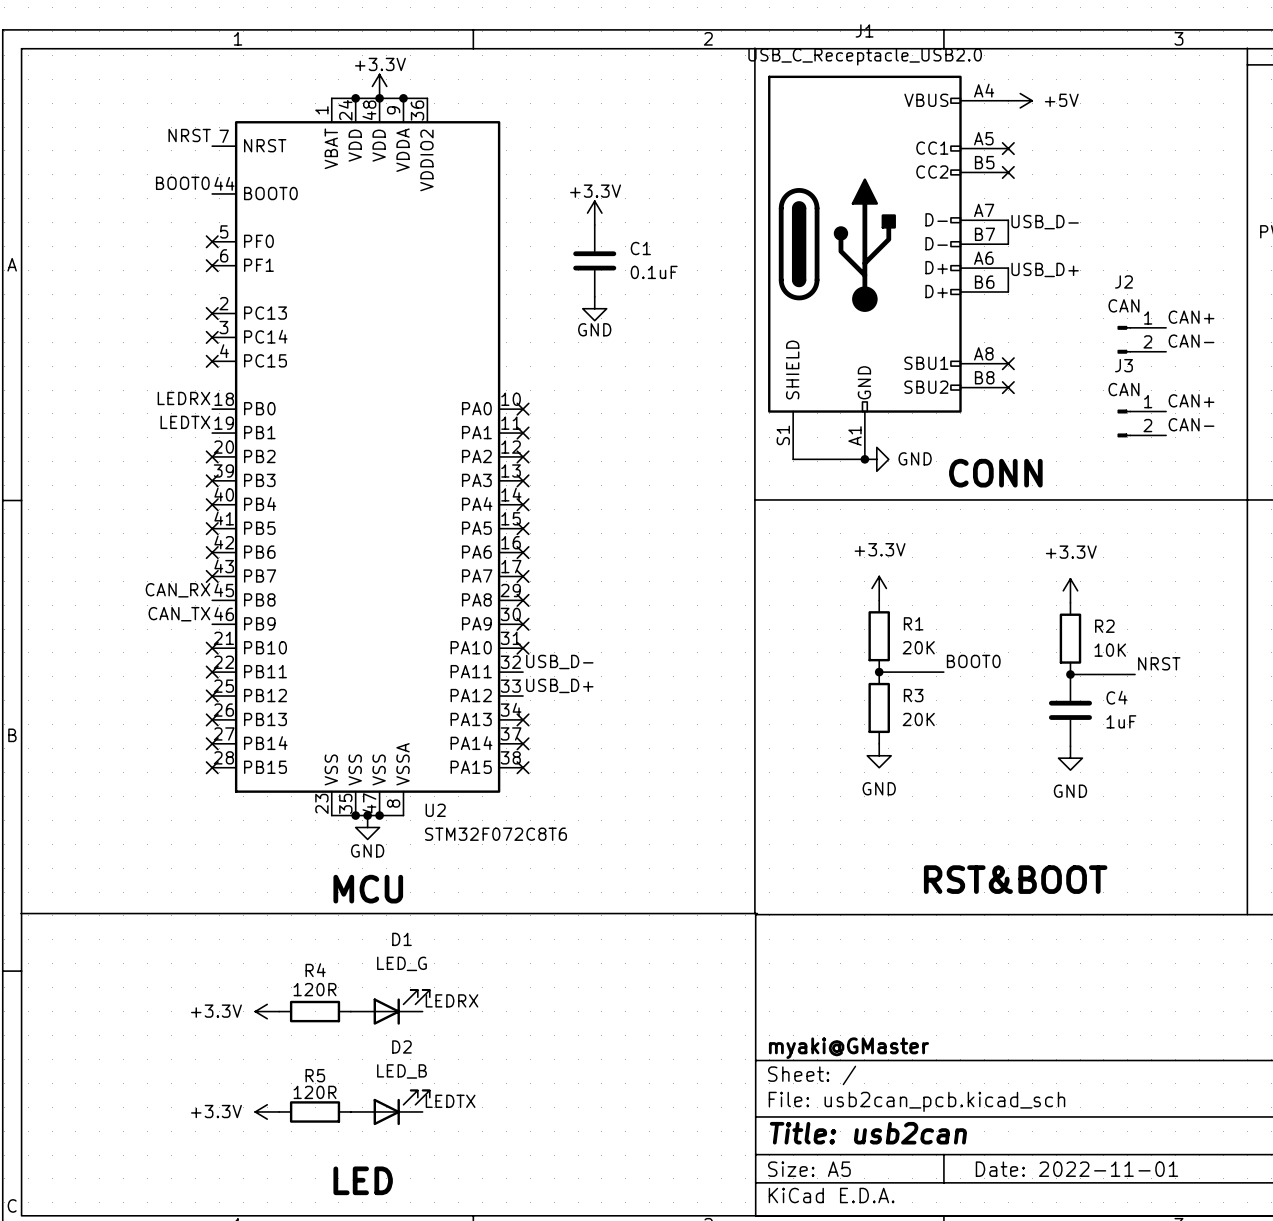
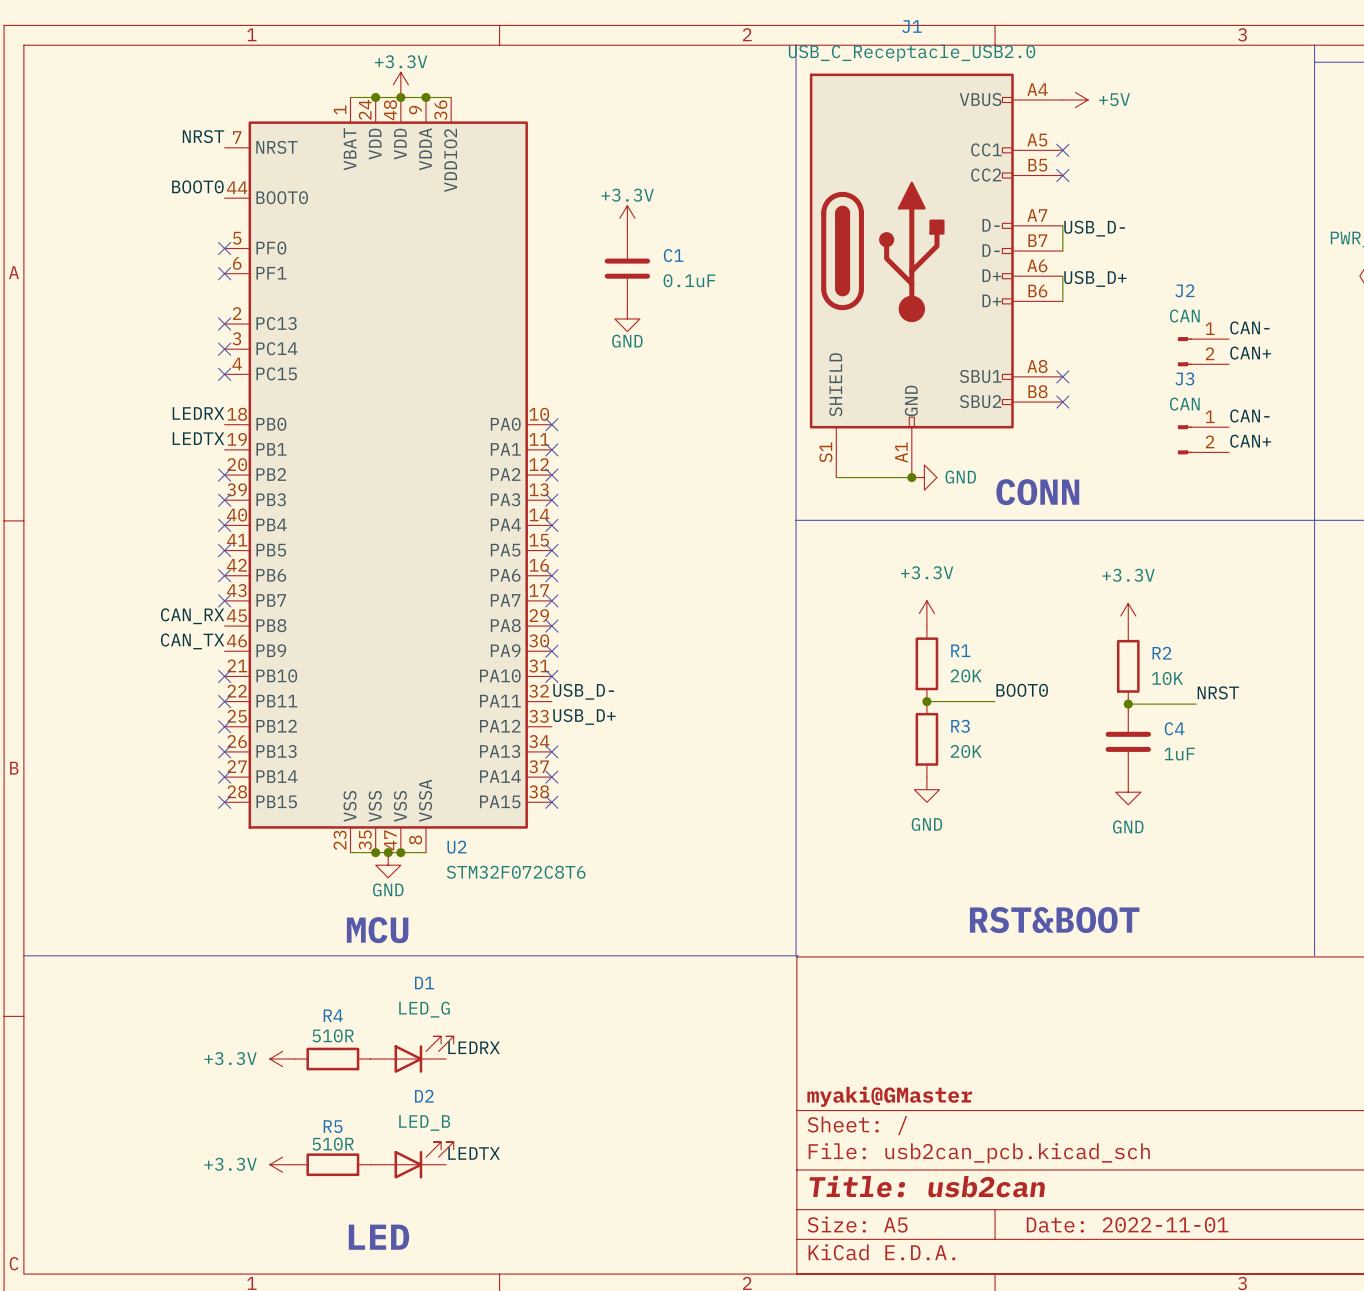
label: CAN+ (1191, 317) -> CAN- (1249, 327)
label: CAN- (1191, 341) -> CAN+ (1250, 353)
label: CAN+ (1191, 400) -> CAN- (1249, 415)
label: CAN- (1191, 424) -> CAN+ (1250, 441)
R4 value: 120R (315, 989) -> 510R (333, 1035)
R5 value: 120R (315, 1092) -> 510R (333, 1144)

